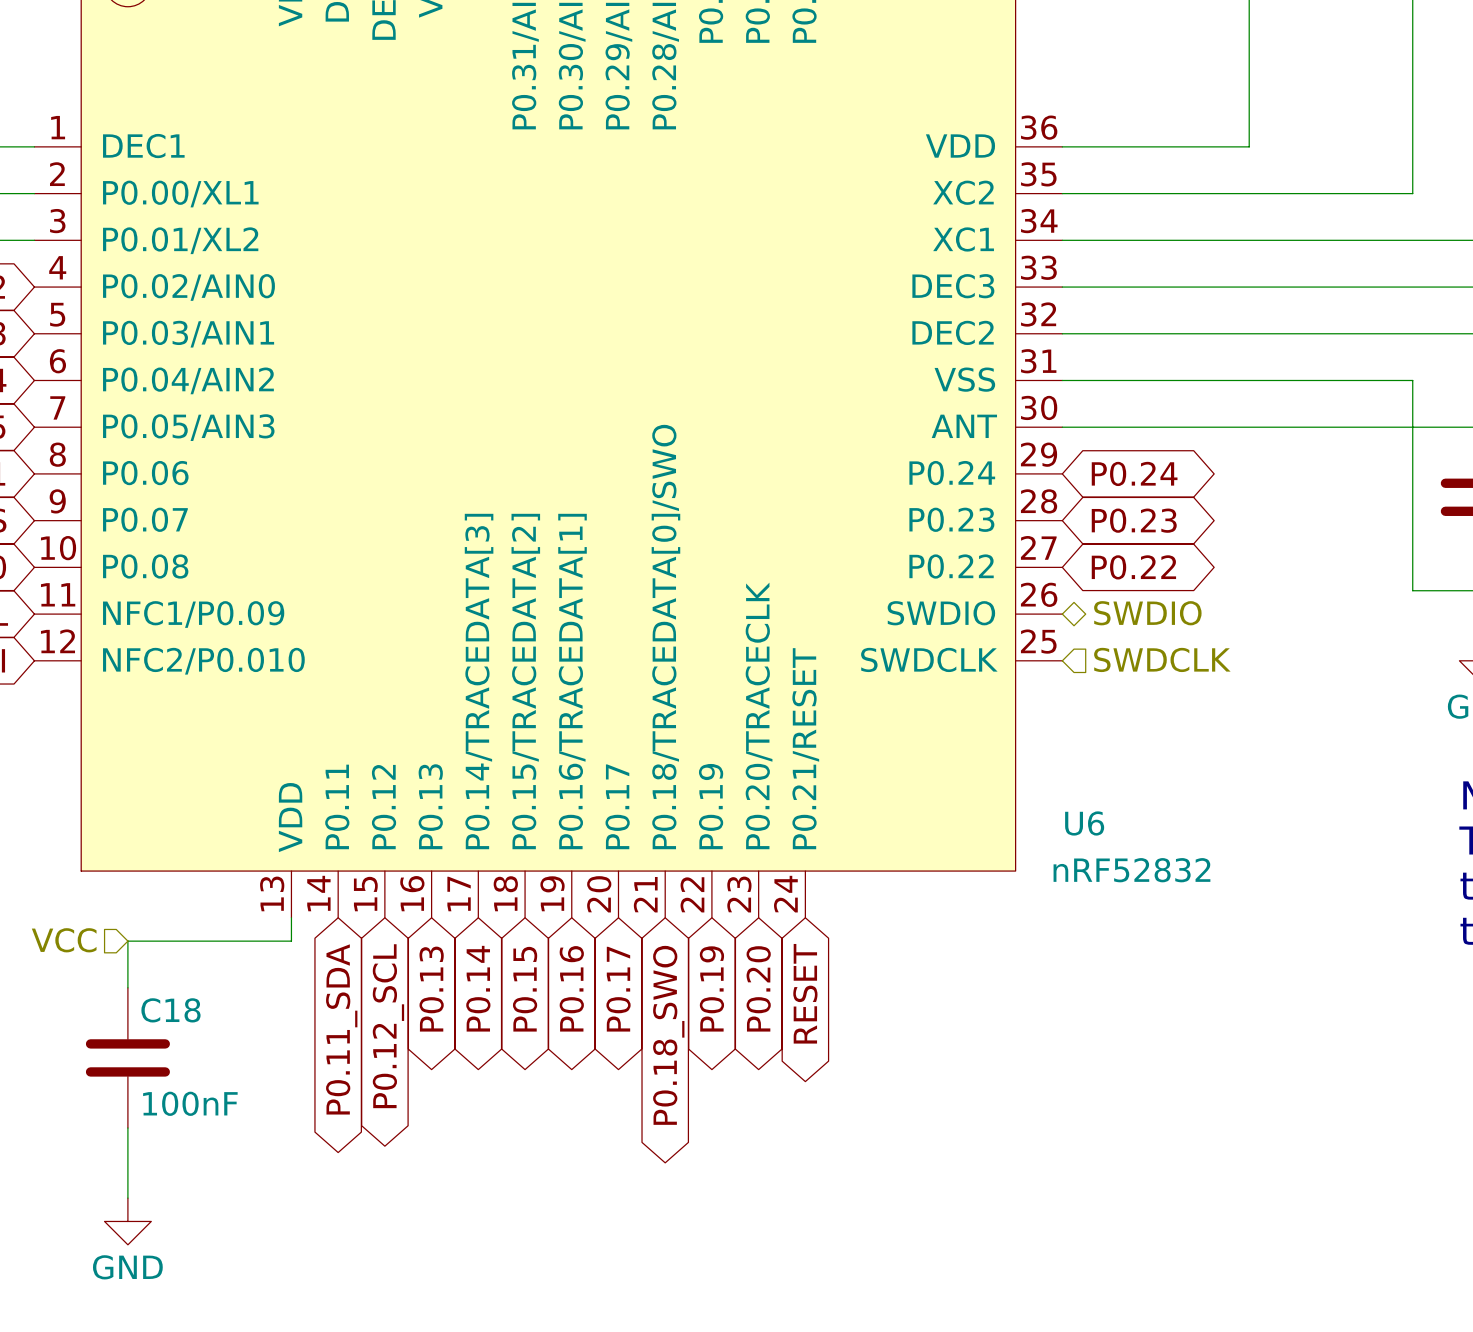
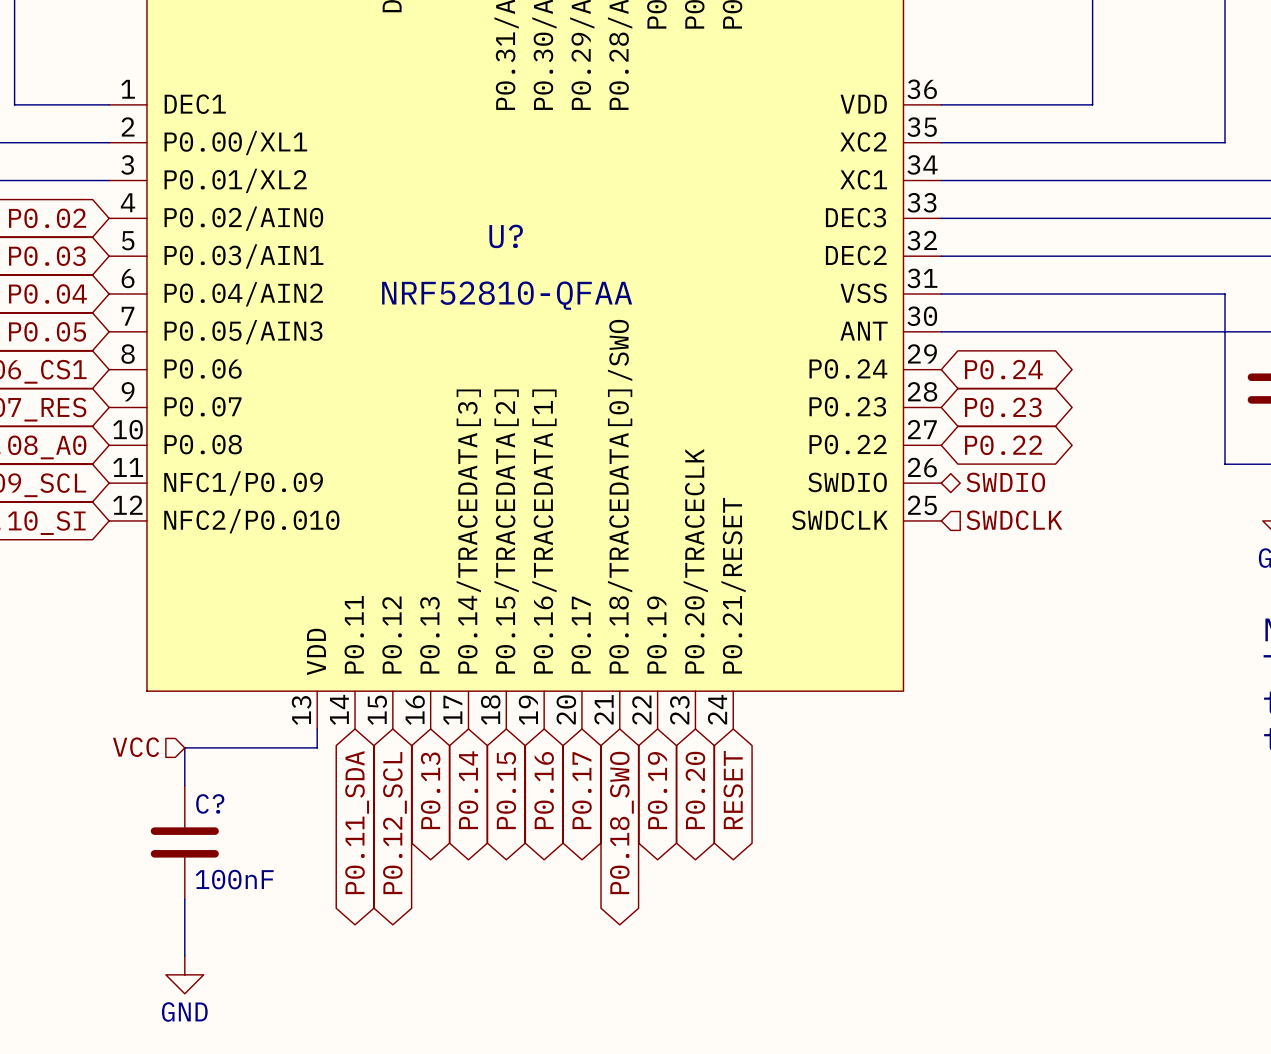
U6 name: U6 (1084, 823) -> U? (506, 236)
U6 value: nRF52832 (1131, 870) -> NRF52810-QFAA (507, 295)
C18 name: C18 (170, 1010) -> C? (210, 803)

